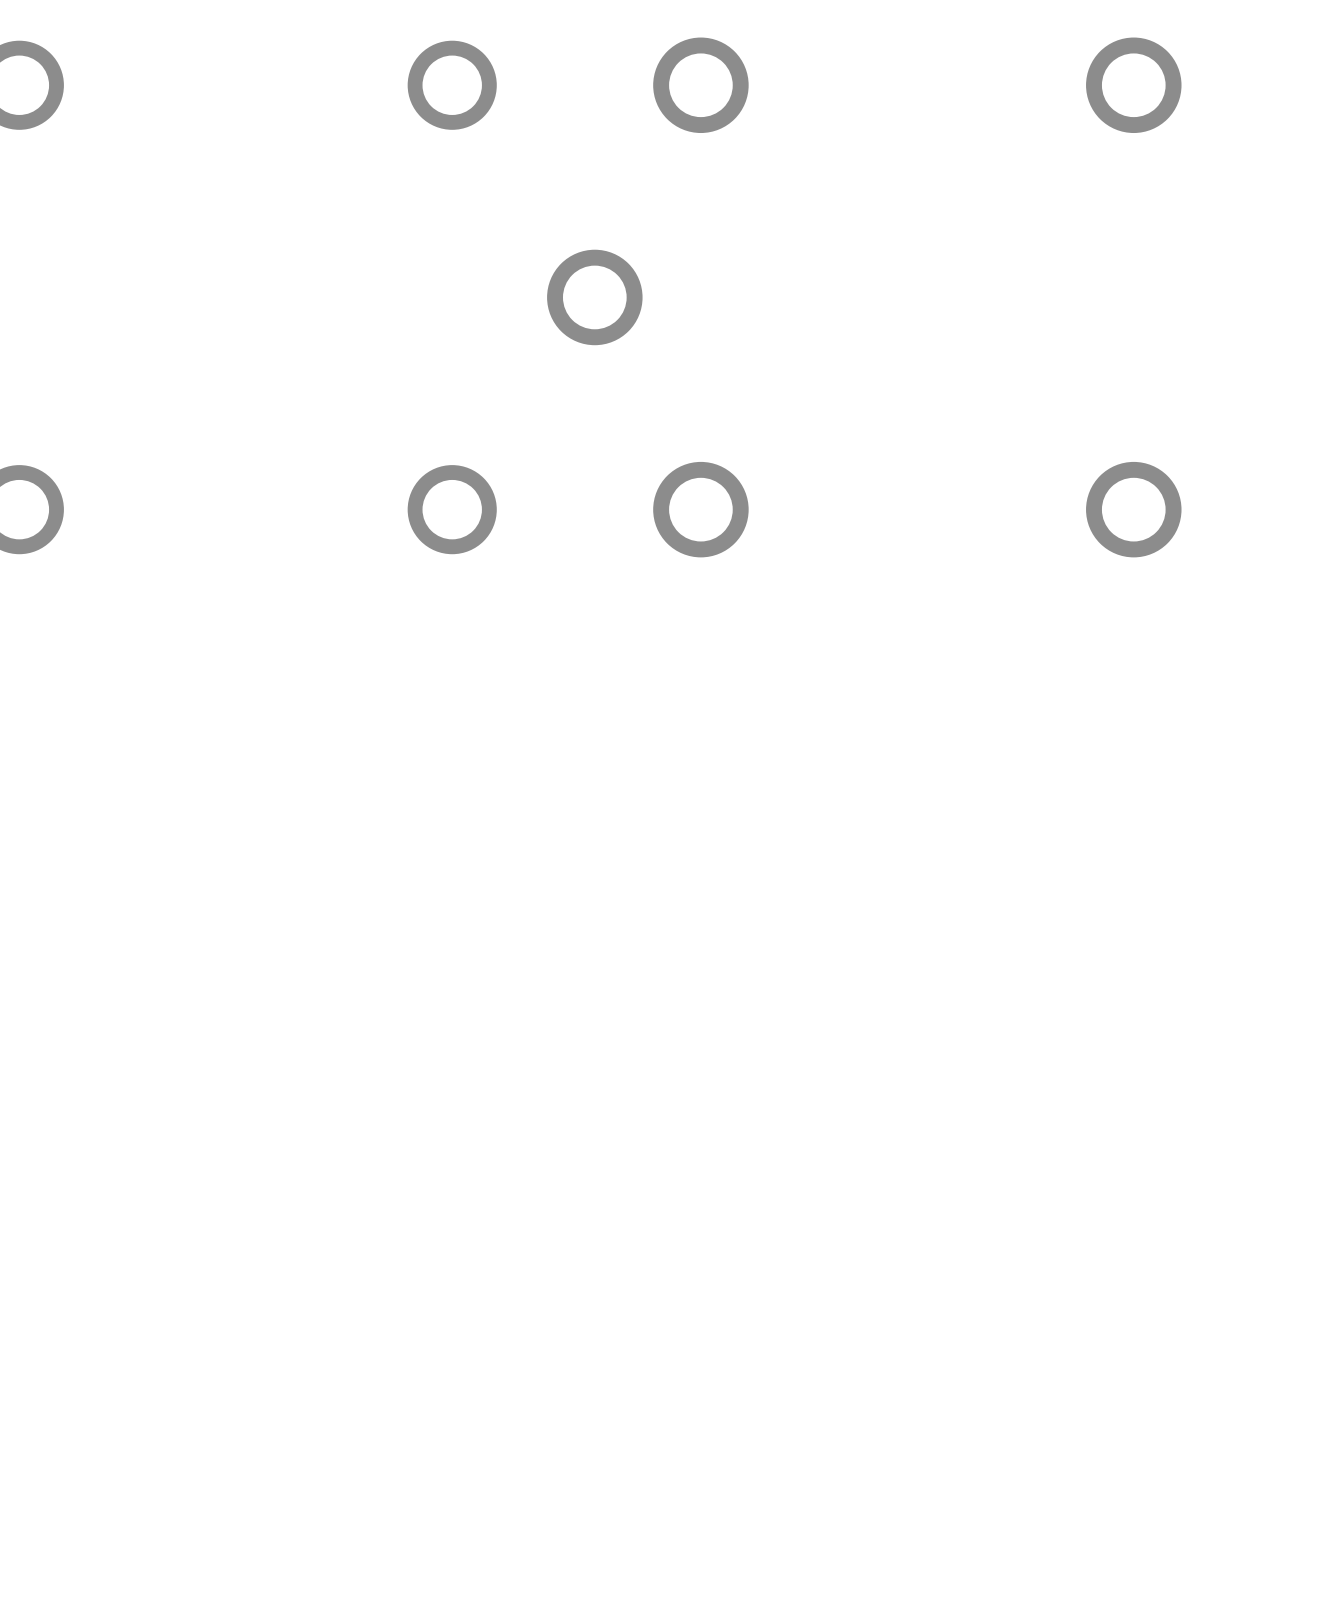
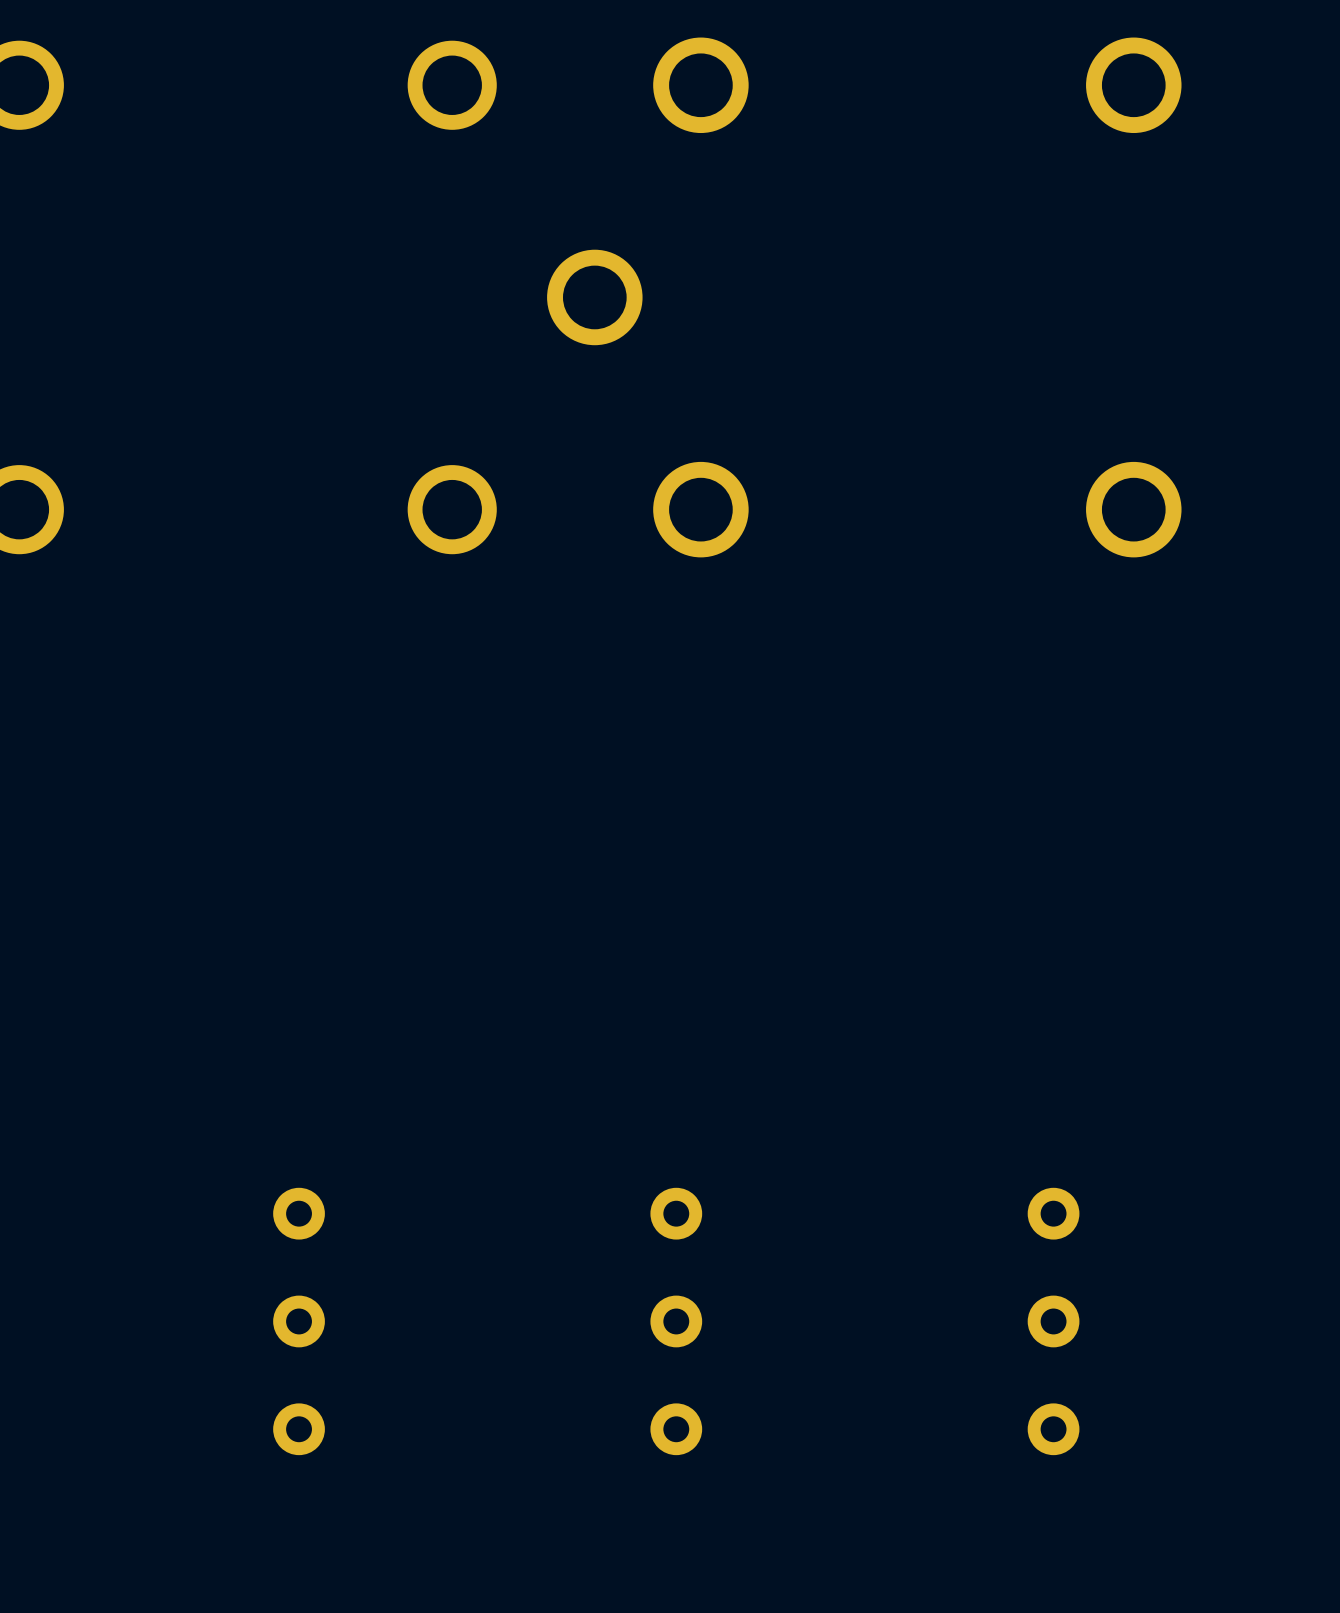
part: none -> (299, 1321)
part: none -> (676, 1321)
part: none -> (1053, 1321)

